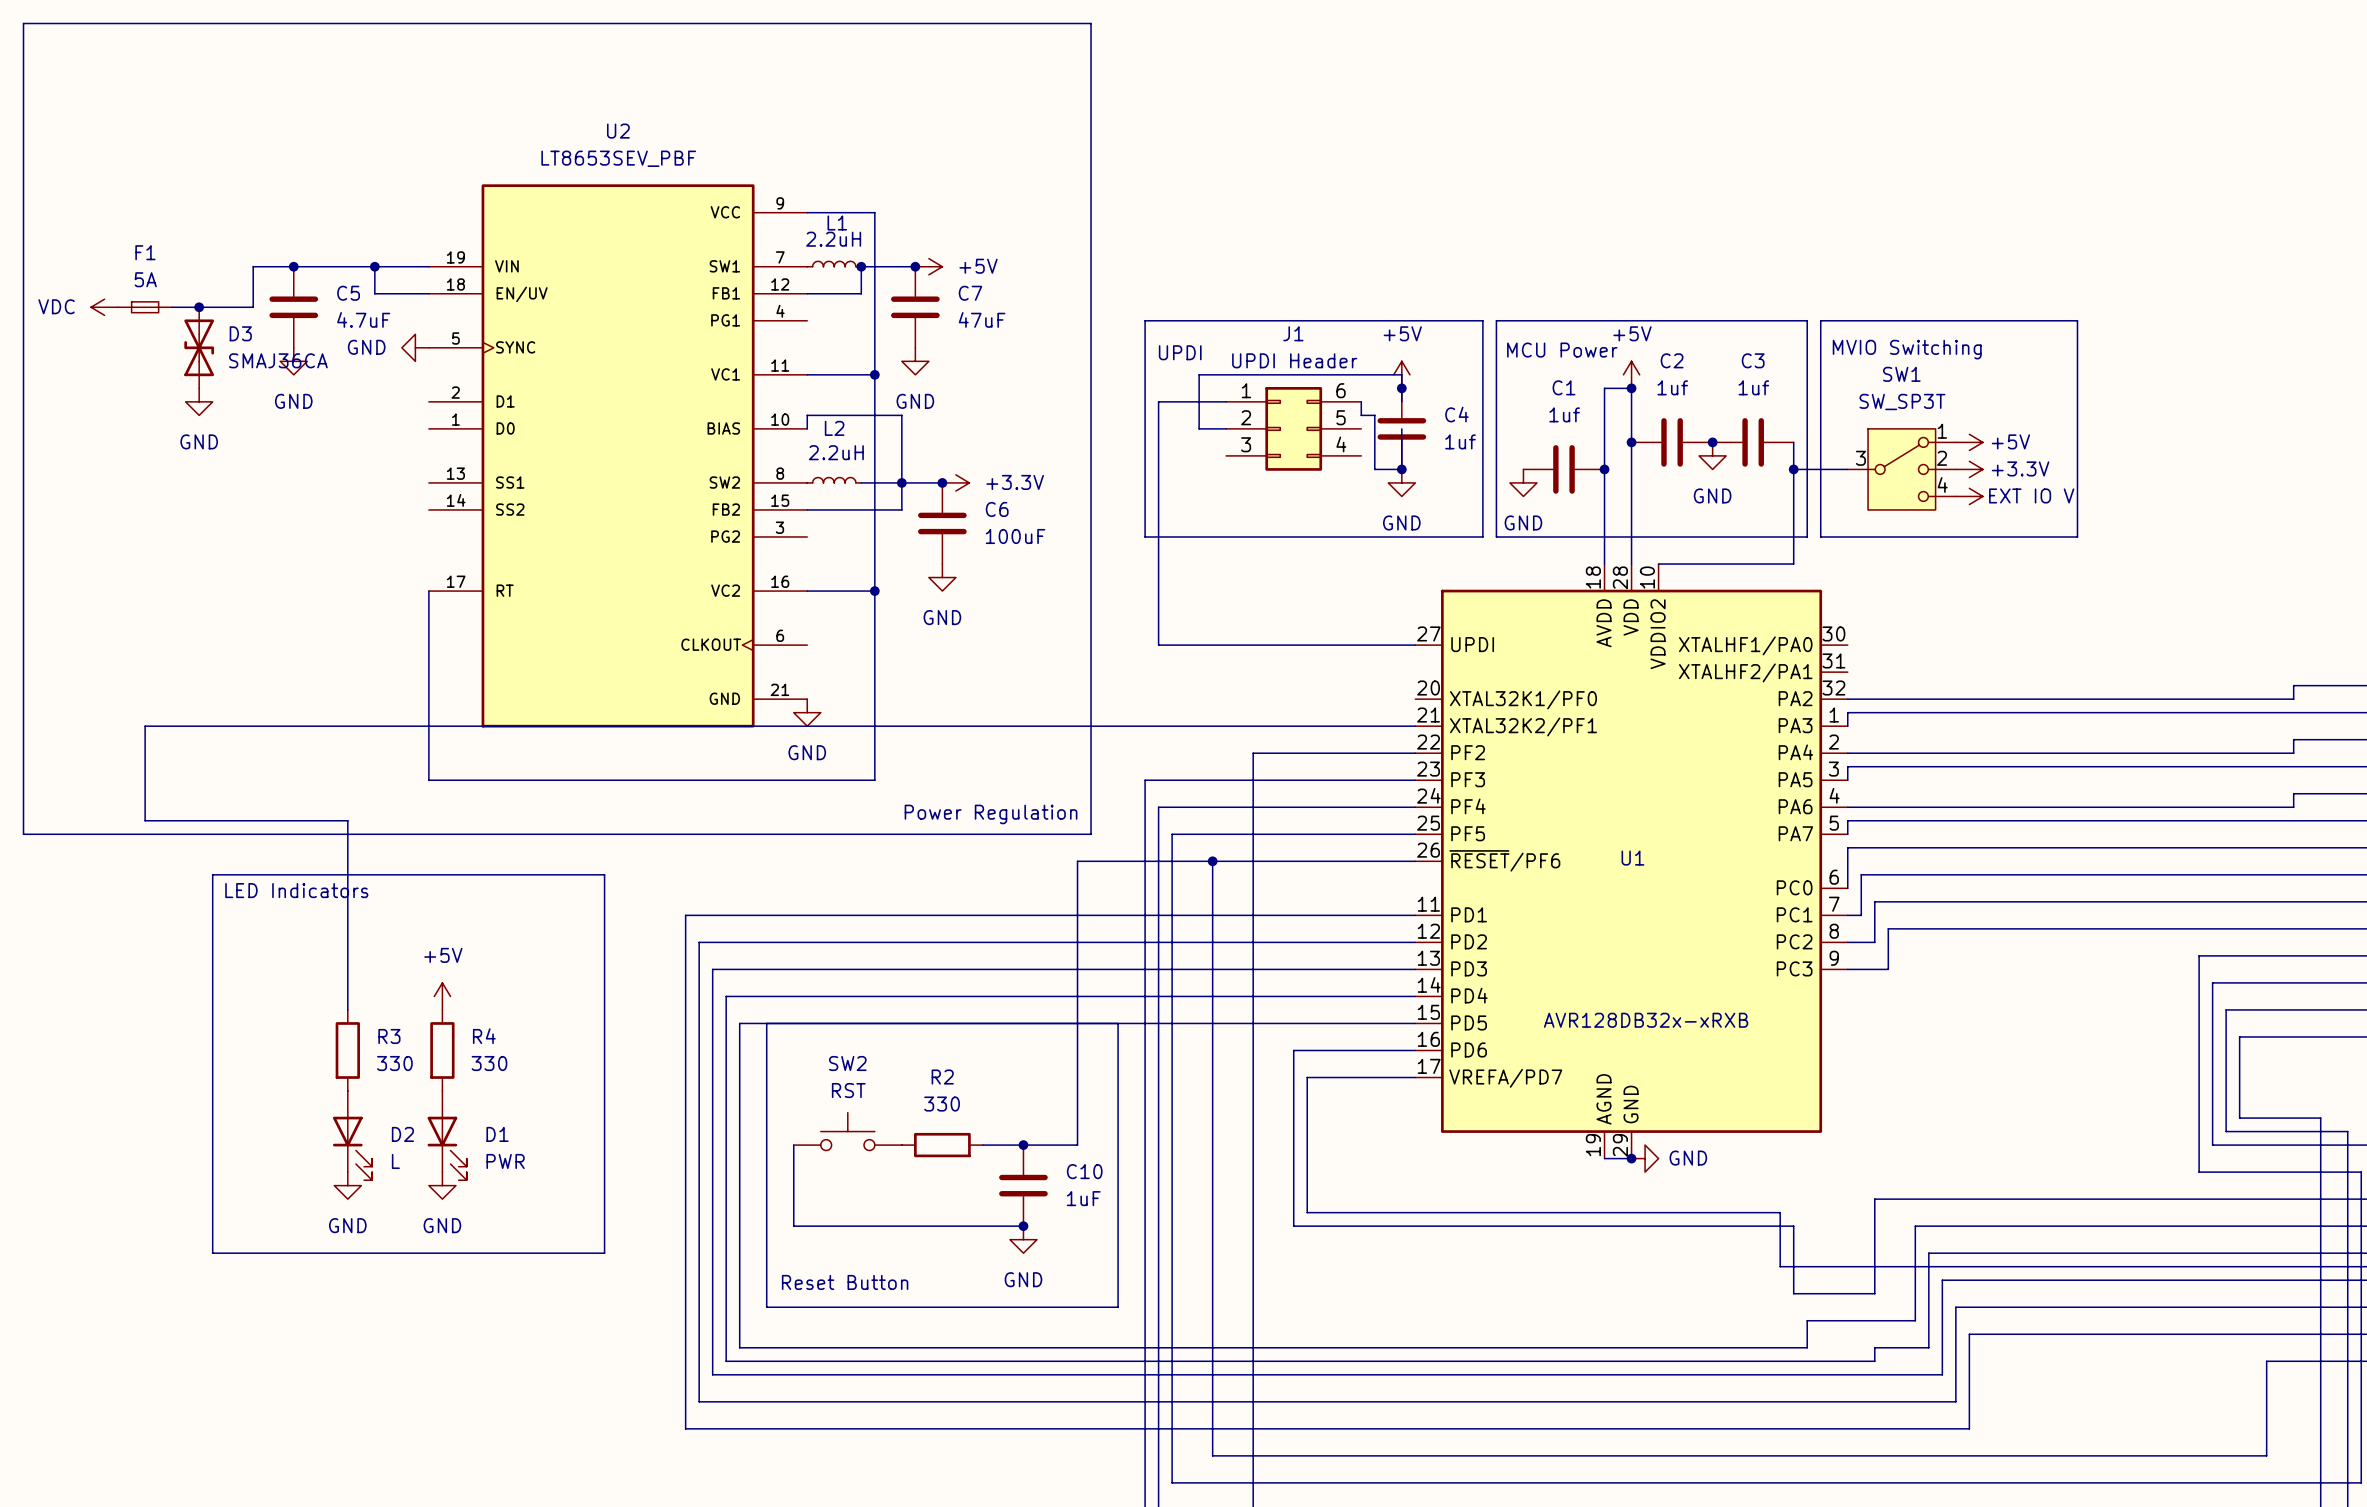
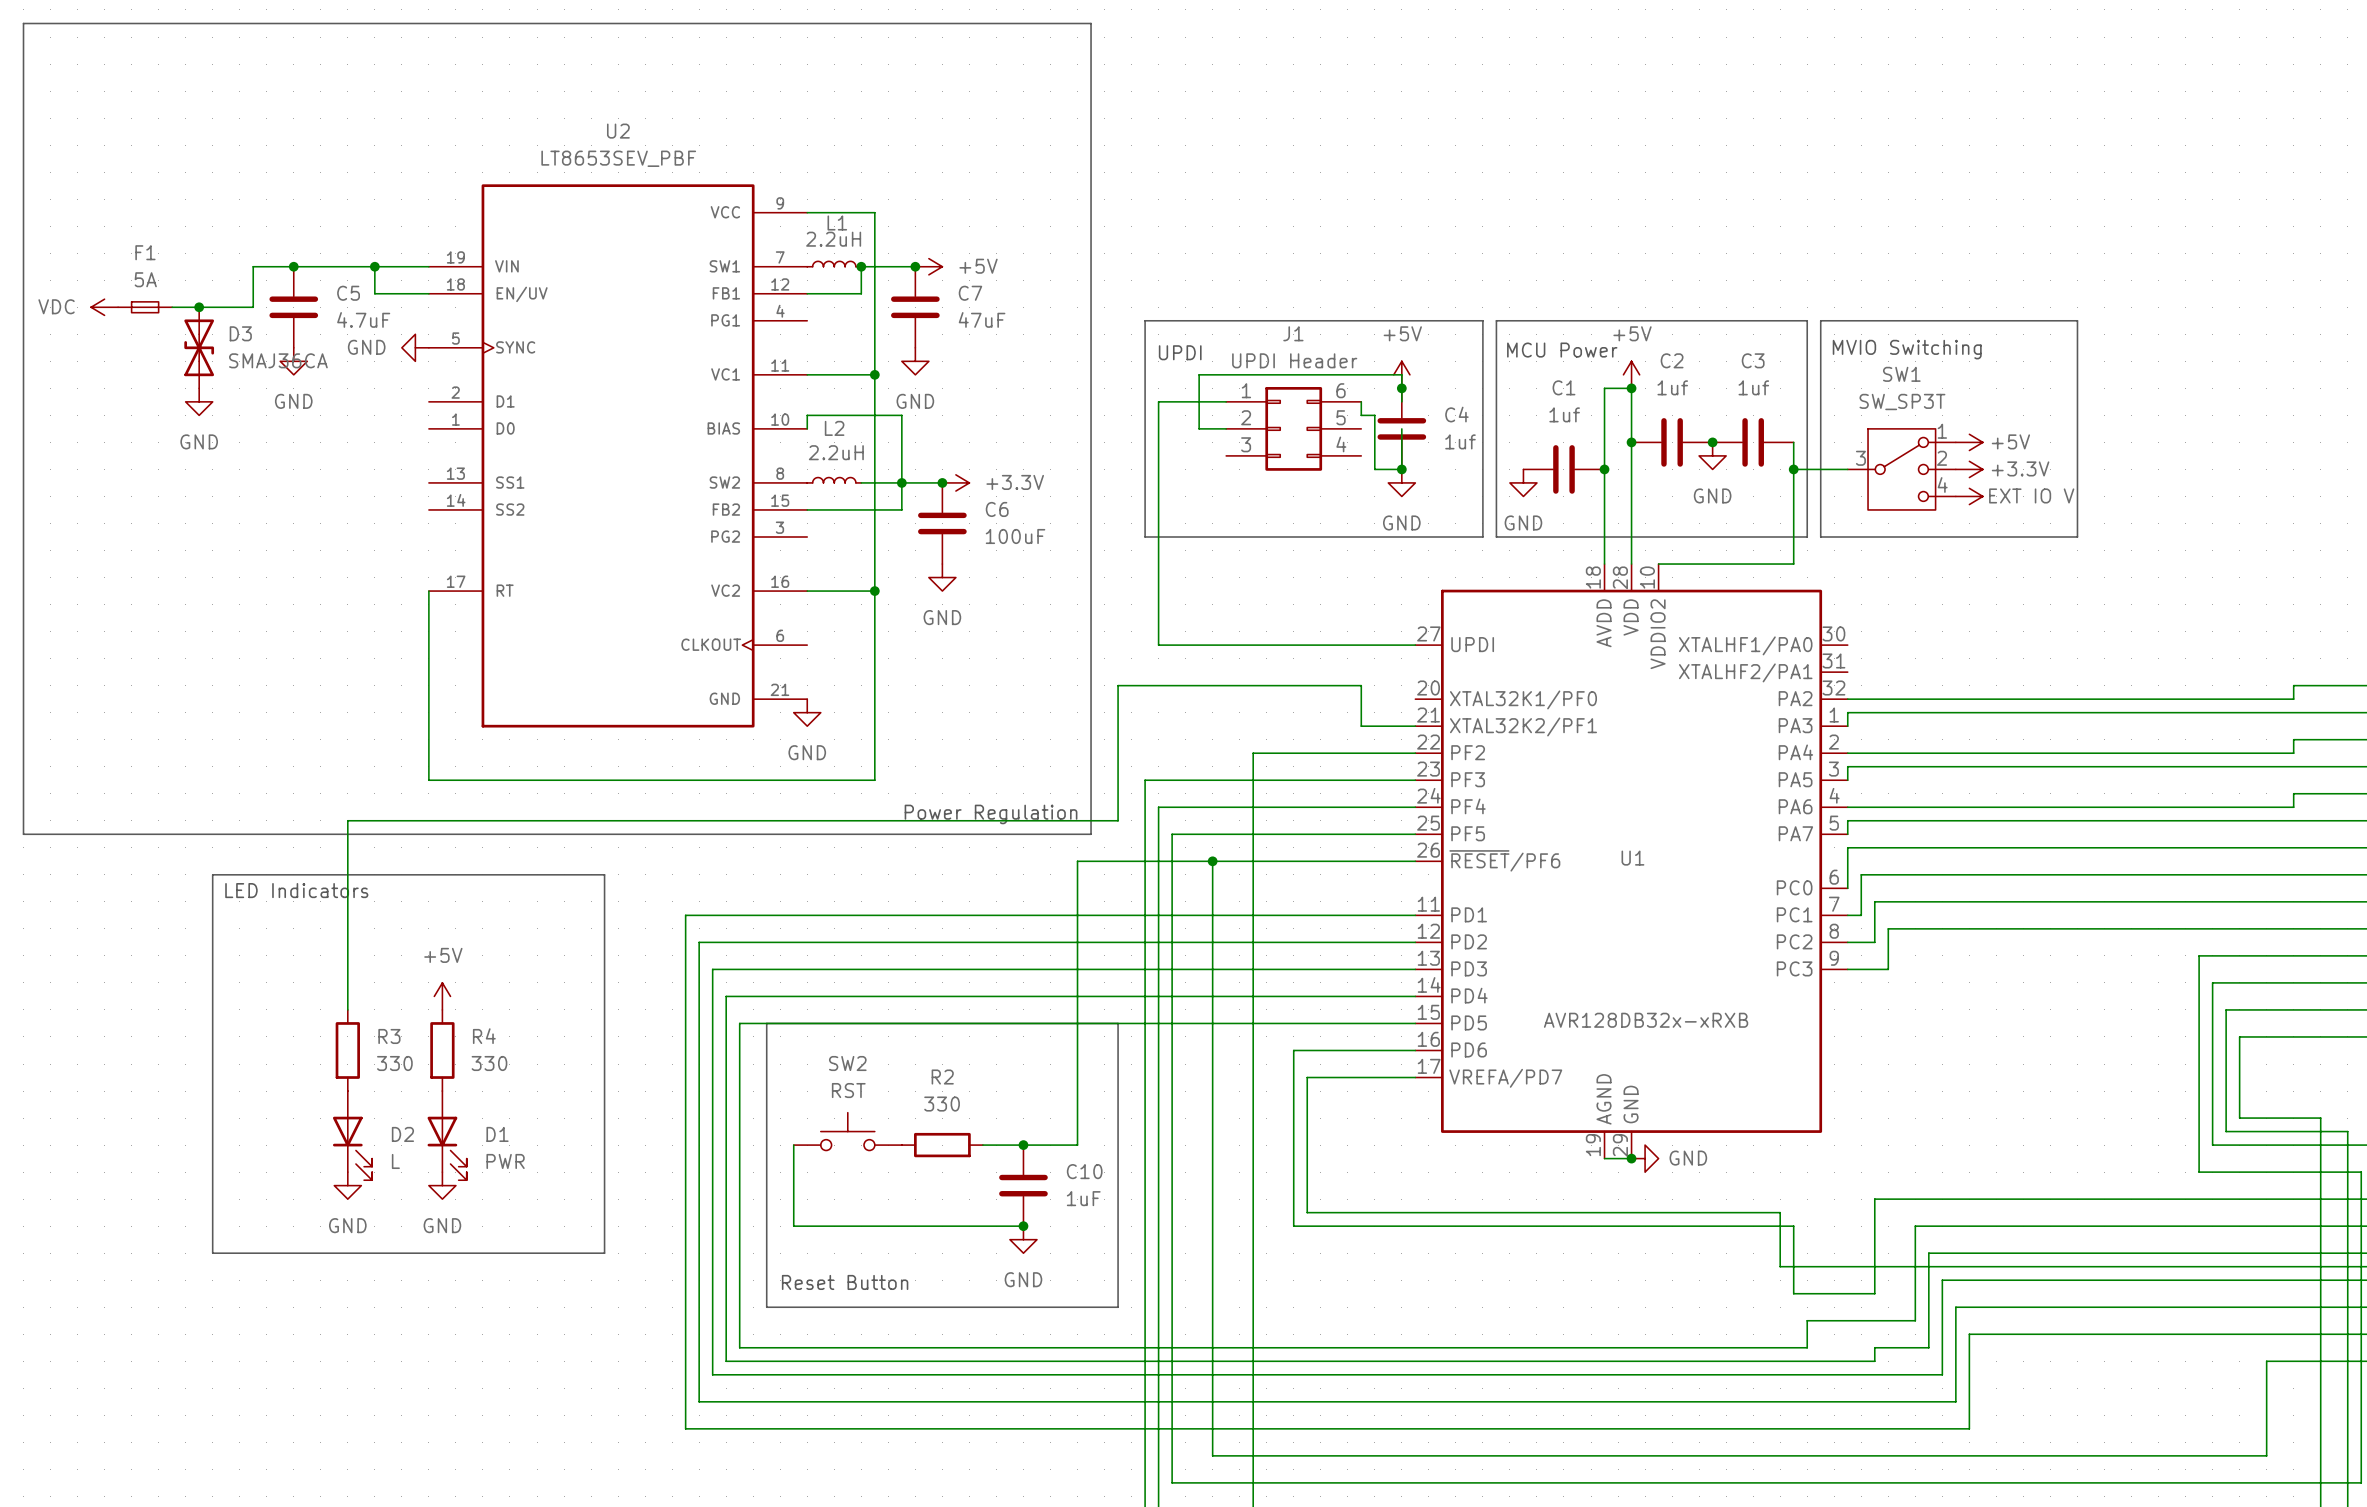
wire: (1361, 726) (145, 726) (145, 820) (347, 820) -> (1361, 726) (1361, 685) (1118, 685) (1118, 820) (347, 820)

